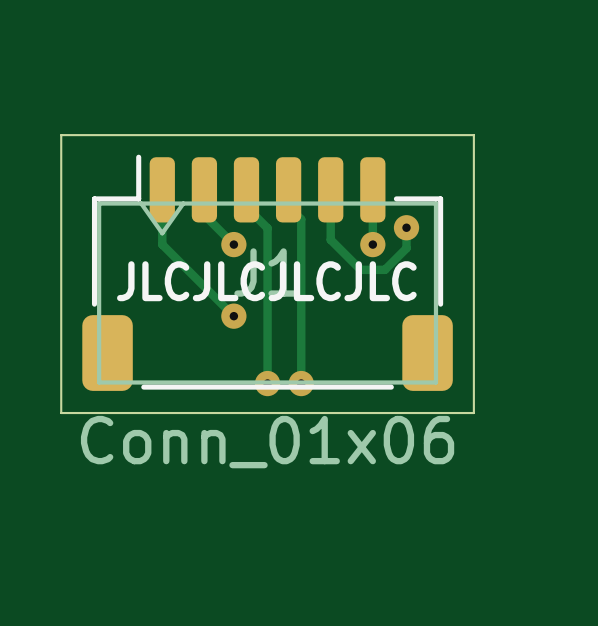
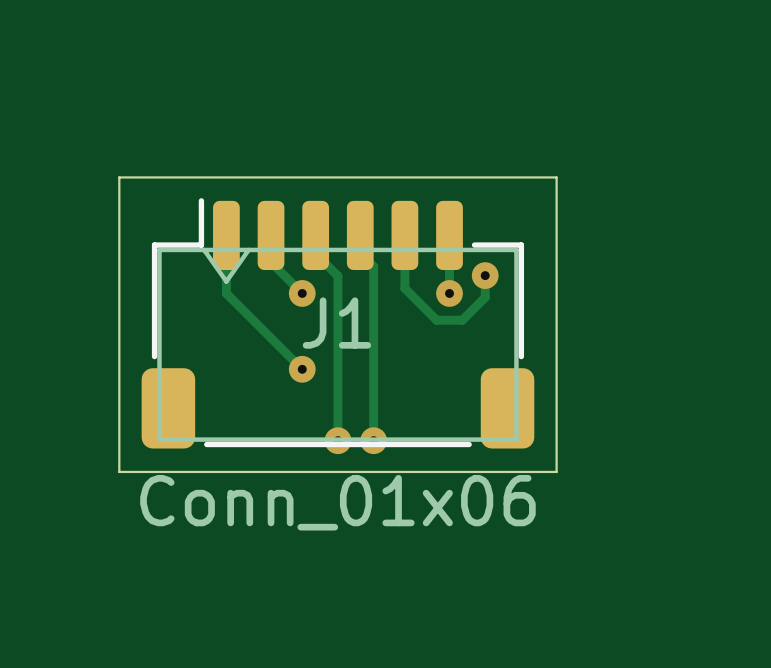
text: JLCJLCJLCJLC (266, 281) -> none

